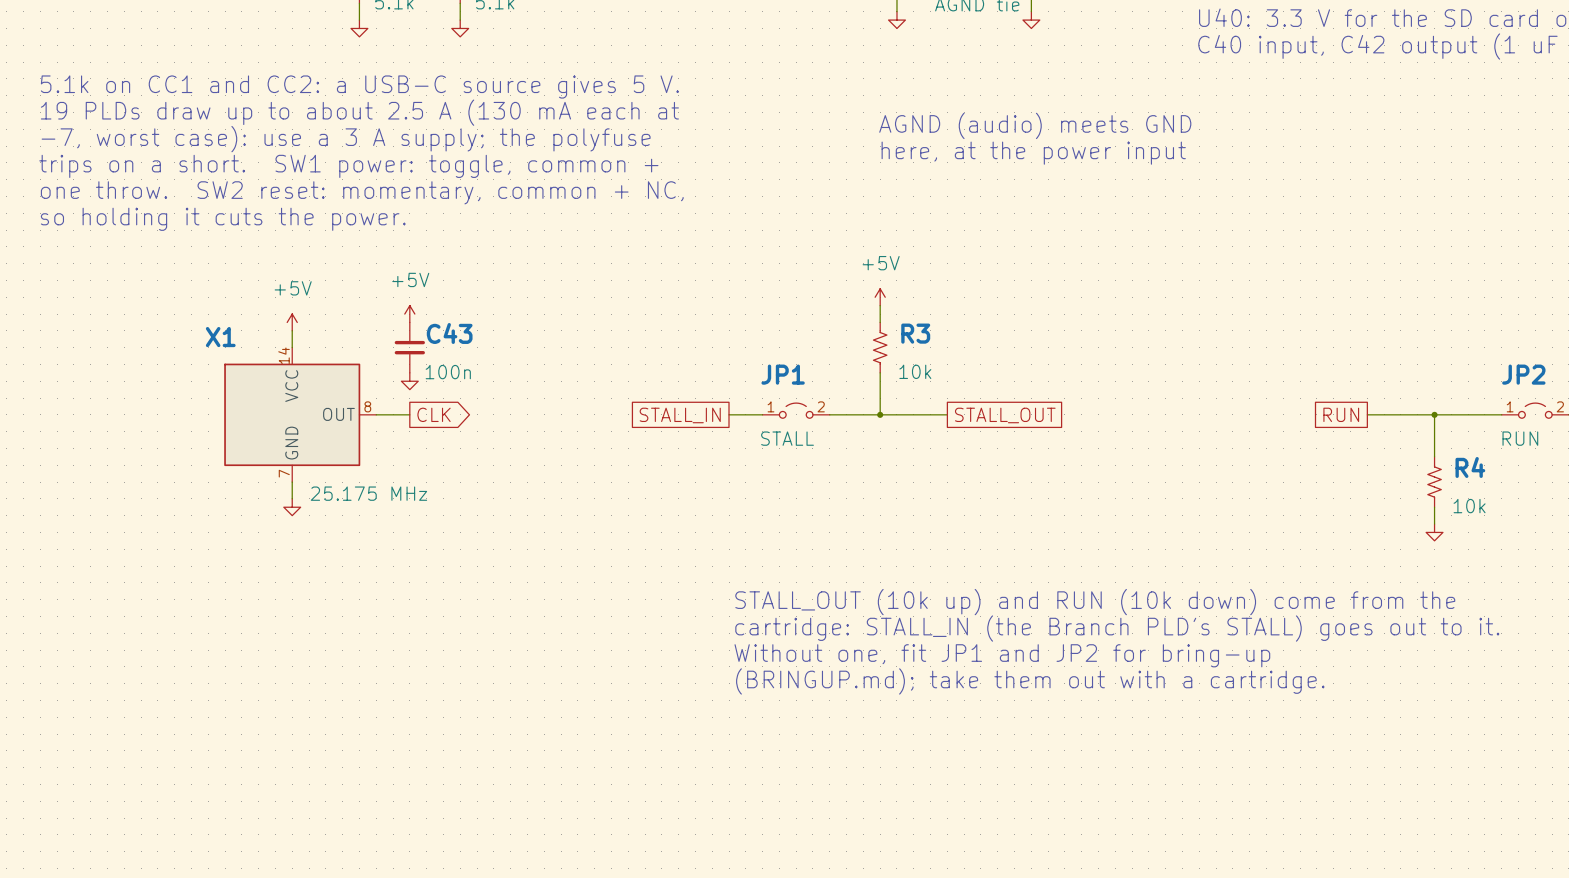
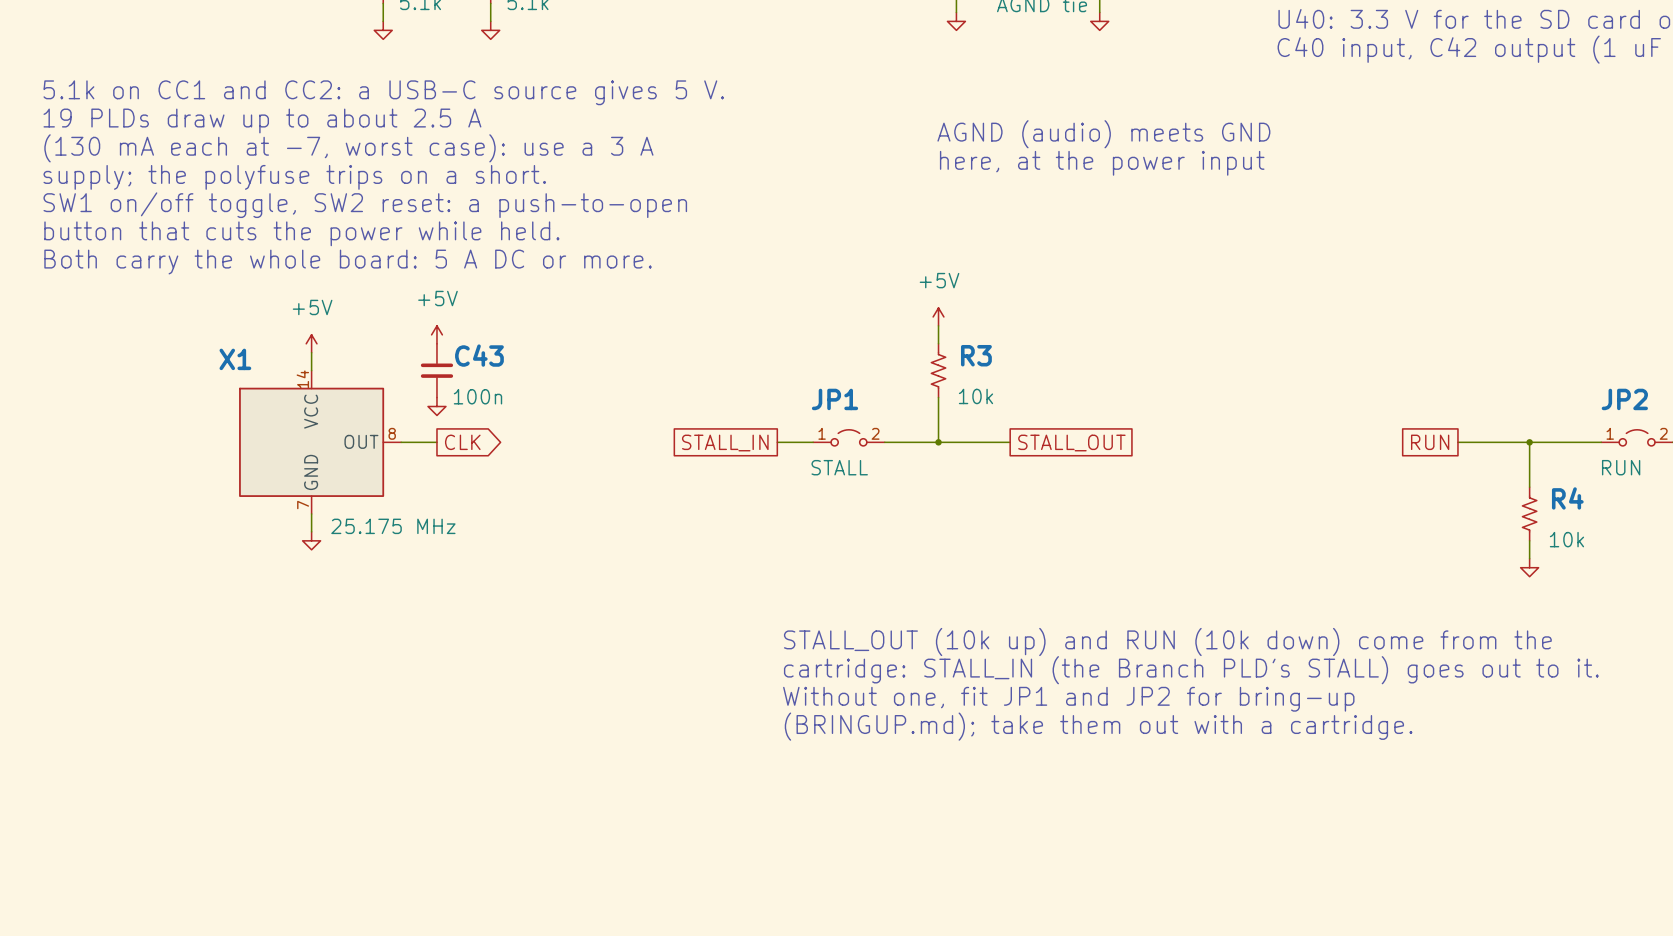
text: 19 PLDs draw up to about 2.5 A (130 mA each at (359, 112) -> 19 PLDs draw up to about 2.5 A (262, 120)
text: -7, worst case): use a 3 A supply; the polyfuse (346, 139) -> (130 mA each at -7, worst case): use a 3 A (348, 148)
text: trips on a short. SW1 power: toggle, common + (348, 166) -> supply; the polyfuse trips on a short. (294, 177)
text: one throw. SW2 reset: momentary, common + NC, (362, 192) -> SW1 on/off toggle, SW2 reset: a push-to-open (365, 205)
text: so holding it cuts the power. (223, 219) -> button that cuts the power while held. (301, 233)
text: none -> Both carry the whole board: 5 A DC or more. (348, 262)

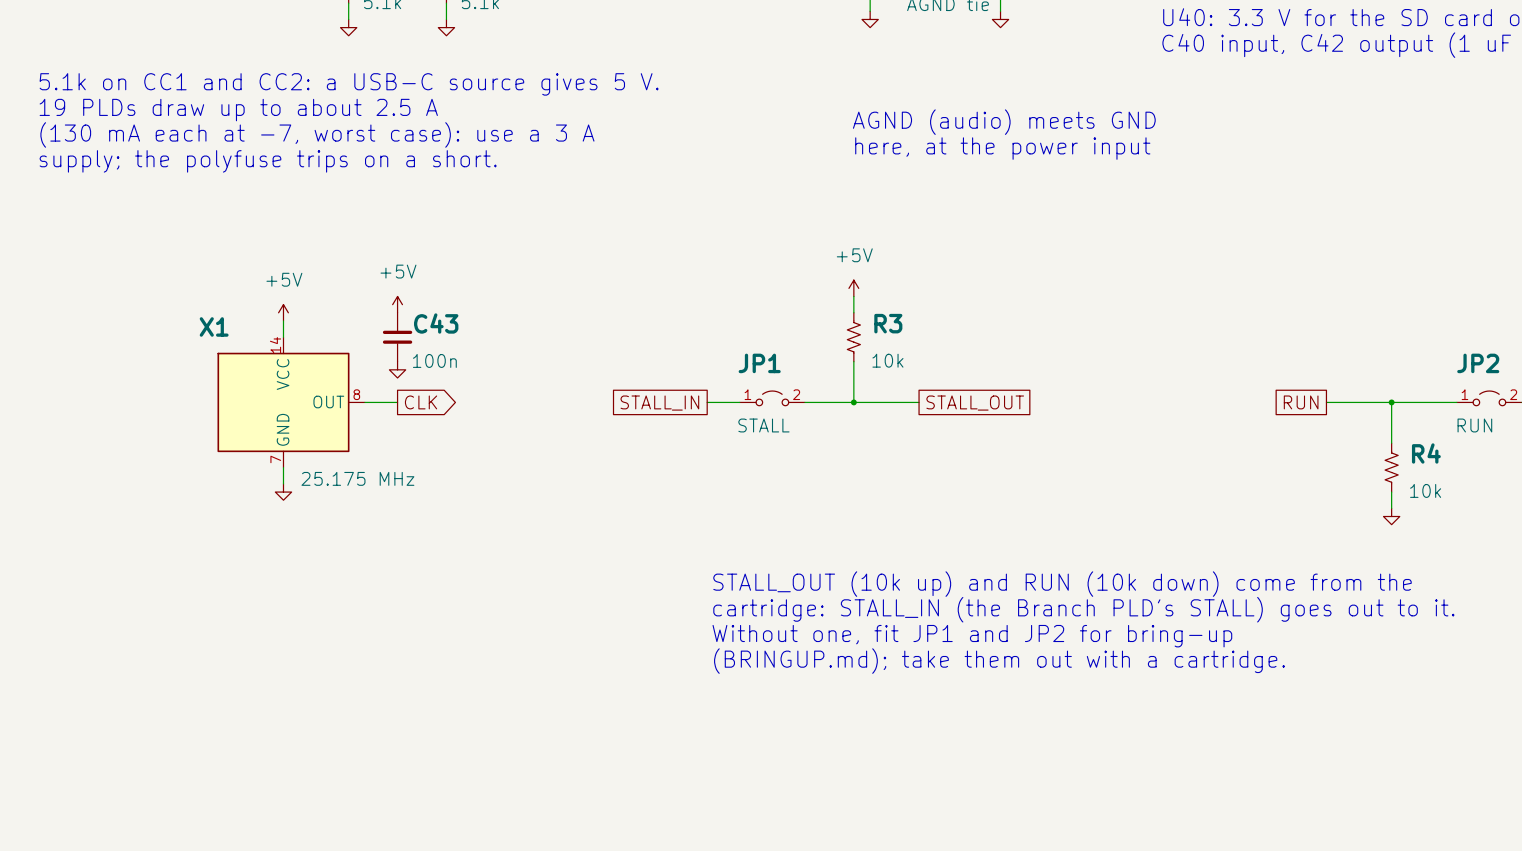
text: SW1 on/off toggle, SW2 reset: a push-to-open (365, 205) -> none
text: button that cuts the power while held. (301, 233) -> none
text: Both carry the whole board: 5 A DC or more. (348, 262) -> none

